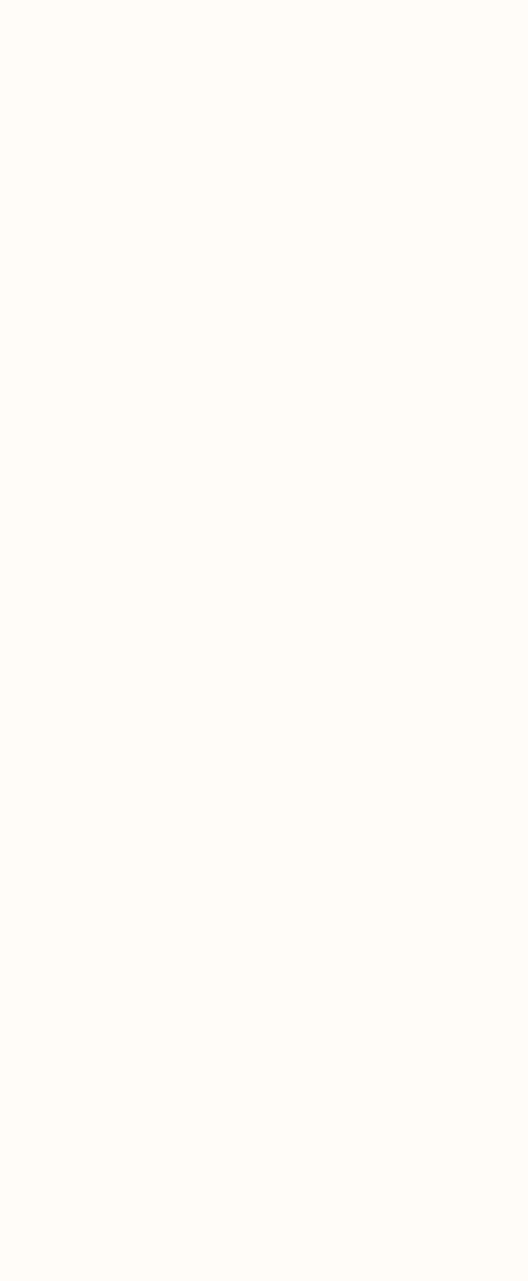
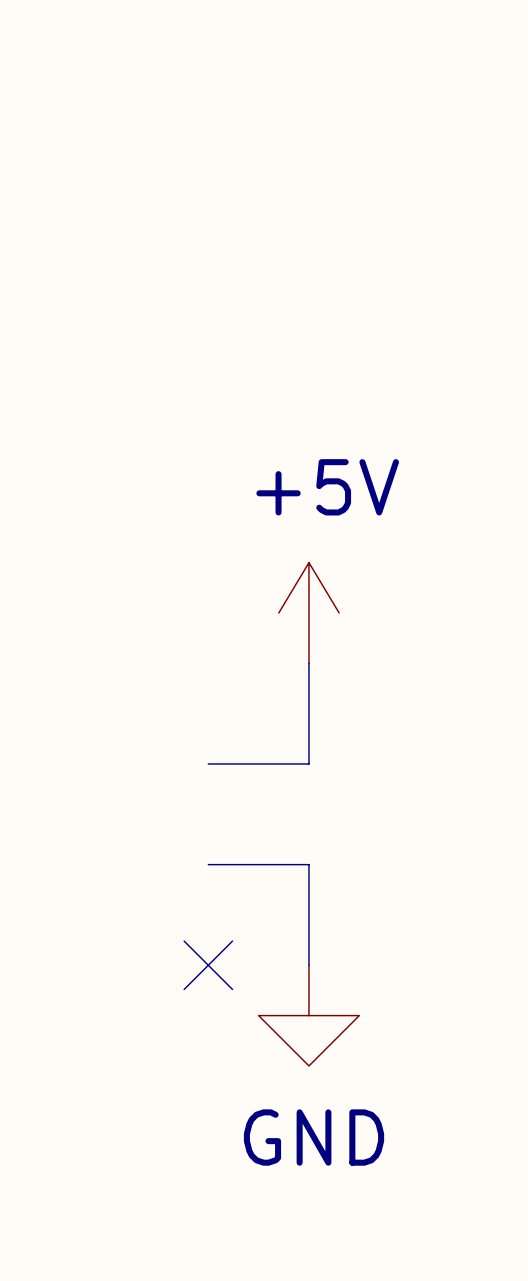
power symbol: none -> +5V (308, 613)
wire: none -> (308, 663) (308, 763) (208, 763)
wire: none -> (208, 864) (308, 864) (308, 965)
no-connect mark: none -> (208, 965)
power symbol: none -> GND (308, 1015)

